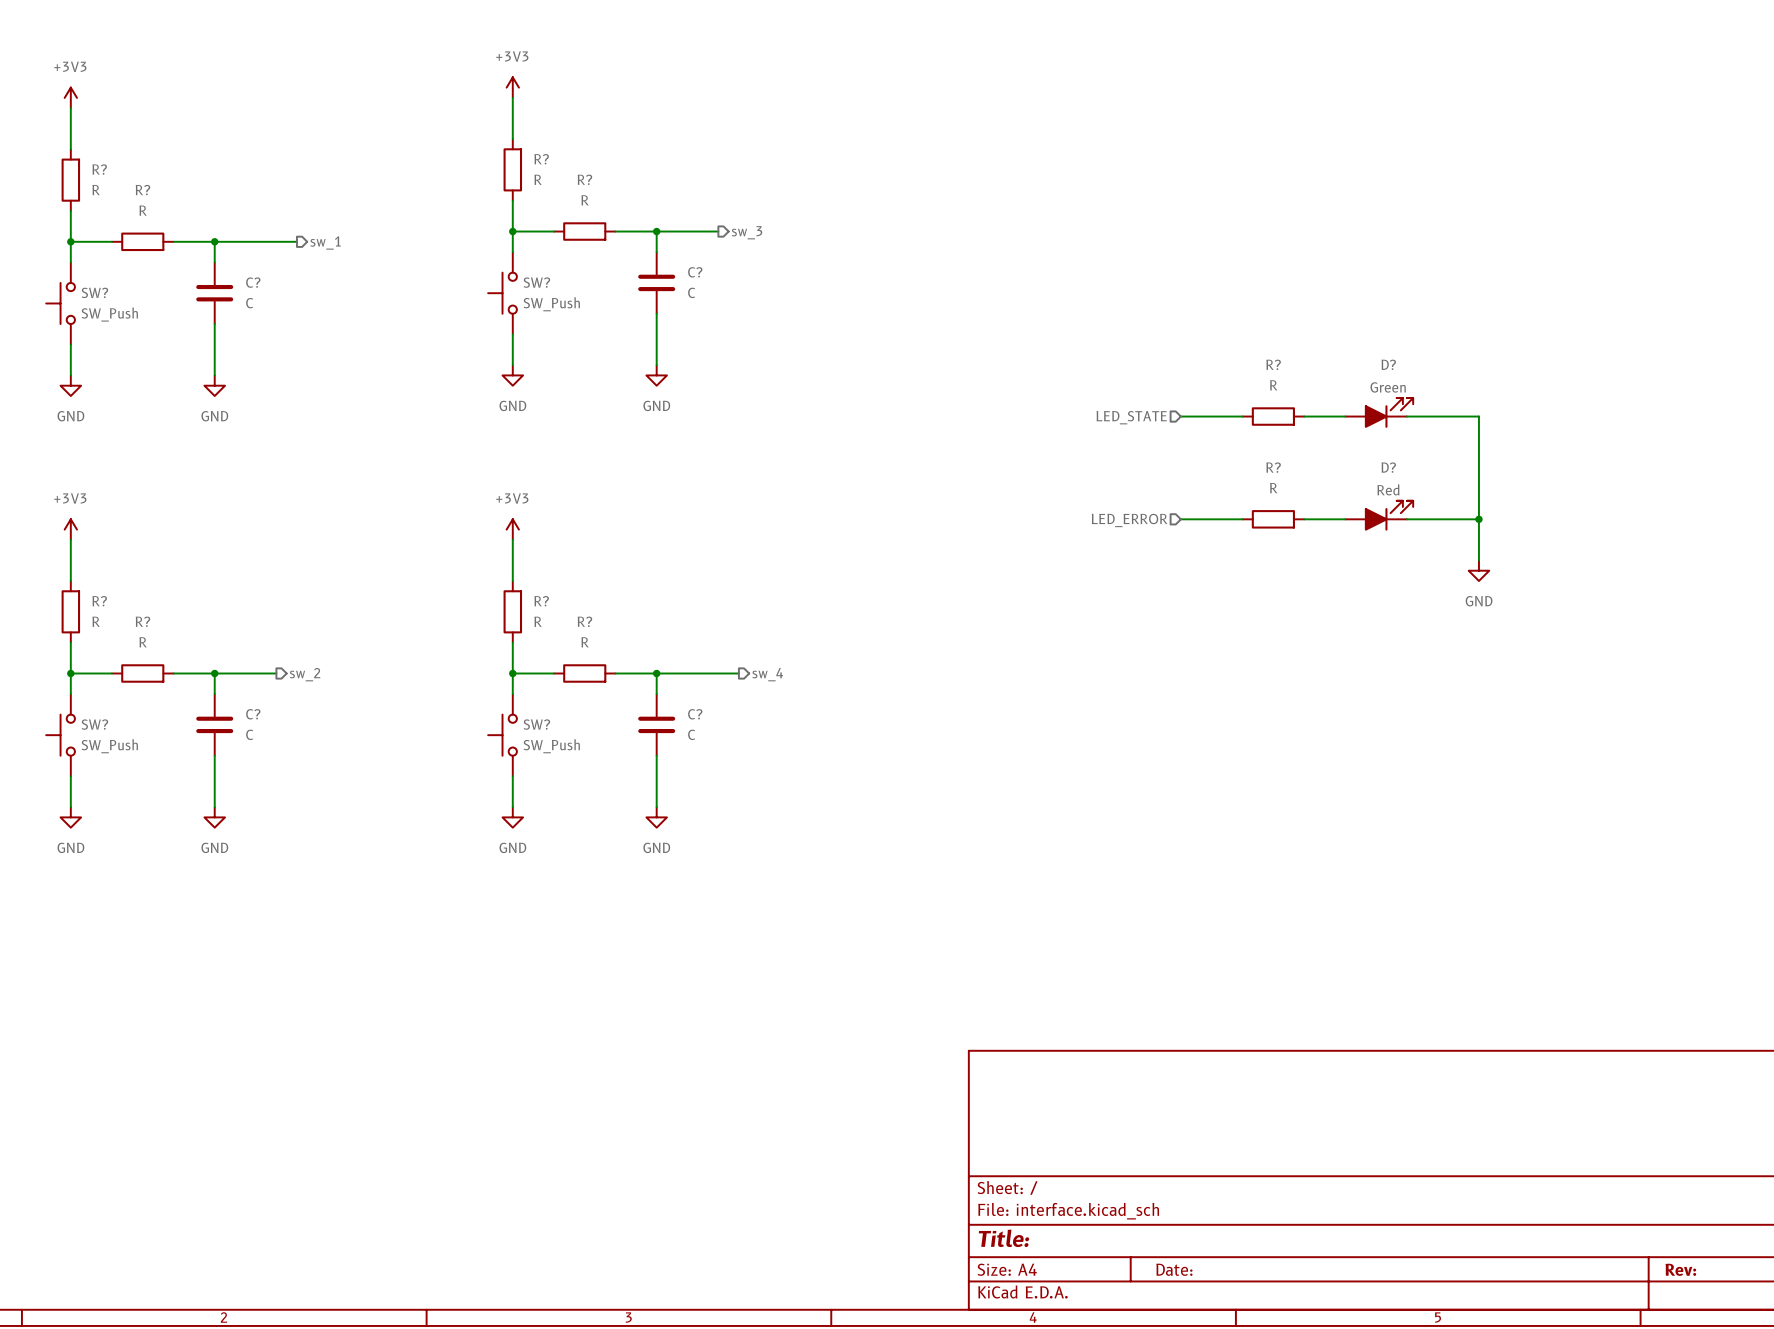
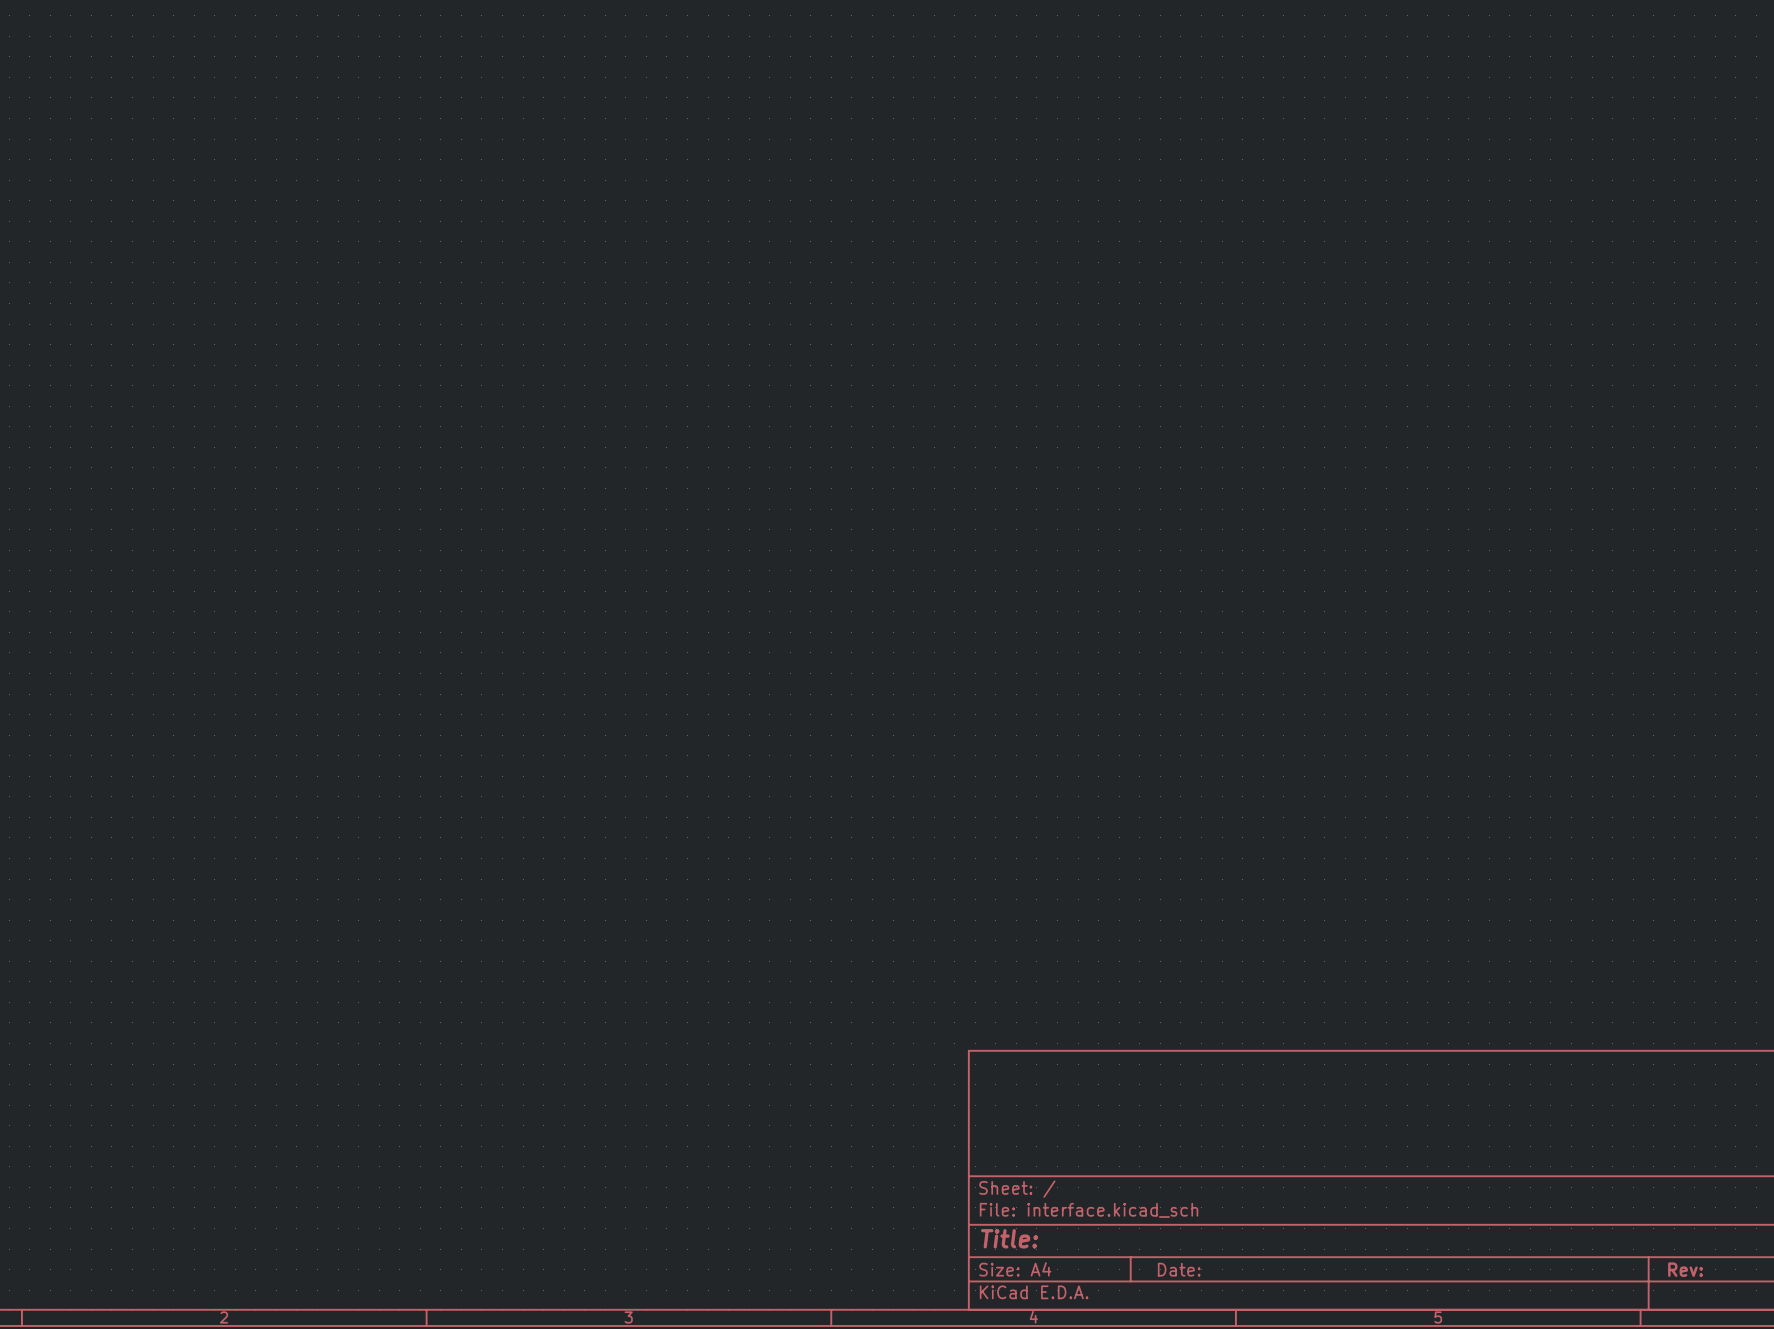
power symbol: +3V3 (512, 87) -> none
power symbol: +3V3 (70, 97) -> none
wire: (512, 97) (512, 139) -> none
wire: (70, 108) (70, 149) -> none
R?: R (512, 169) -> none
R?: R (70, 180) -> none
wire: (512, 200) (512, 252) -> none
wire: (70, 210) (70, 262) -> none
wire: (512, 231) (553, 231) -> none
junction: (512, 231) -> none
R?: R (584, 231) -> none
wire: (615, 231) (718, 231) -> none
wire: (656, 231) (656, 252) -> none
junction: (656, 231) -> none
hierarchical label: sw_3 (747, 232) -> none
wire: (70, 241) (111, 241) -> none
junction: (70, 241) -> none
R?: R (142, 241) -> none
wire: (173, 241) (296, 241) -> none
wire: (214, 241) (214, 262) -> none
junction: (214, 241) -> none
hierarchical label: sw_1 (325, 242) -> none
C?: C (656, 282) -> none
C?: C (214, 293) -> none
SW?: SW_Push (502, 293) -> none
SW?: SW_Push (60, 303) -> none
wire: (656, 313) (656, 365) -> none
wire: (214, 324) (214, 375) -> none
wire: (512, 334) (512, 365) -> none
wire: (70, 344) (70, 375) -> none
power symbol: GND (512, 375) -> none
power symbol: GND (656, 375) -> none
power symbol: GND (70, 385) -> none
power symbol: GND (214, 385) -> none
D?: Green (1379, 412) -> none
wire: (1180, 416) (1242, 416) -> none
R?: R (1273, 416) -> none
wire: (1304, 416) (1345, 416) -> none
wire: (1407, 416) (1478, 416) (1478, 560) -> none
hierarchical label: LED_STATE (1131, 417) -> none
D?: Red (1379, 515) -> none
wire: (1180, 519) (1242, 519) -> none
R?: R (1273, 519) -> none
wire: (1304, 519) (1345, 519) -> none
wire: (1407, 519) (1478, 519) -> none
junction: (1478, 519) -> none
hierarchical label: LED_ERROR (1129, 520) -> none
power symbol: +3V3 (70, 529) -> none
power symbol: +3V3 (512, 529) -> none
wire: (70, 539) (70, 580) -> none
wire: (512, 539) (512, 580) -> none
power symbol: GND (1478, 570) -> none
R?: R (70, 611) -> none
R?: R (512, 611) -> none
wire: (70, 642) (70, 694) -> none
wire: (512, 642) (512, 694) -> none
wire: (70, 673) (111, 673) -> none
junction: (70, 673) -> none
R?: R (142, 673) -> none
wire: (173, 673) (276, 673) -> none
wire: (214, 673) (214, 694) -> none
junction: (214, 673) -> none
wire: (512, 673) (553, 673) -> none
junction: (512, 673) -> none
R?: R (584, 673) -> none
wire: (615, 673) (738, 673) -> none
wire: (656, 673) (656, 694) -> none
junction: (656, 673) -> none
hierarchical label: sw_2 (305, 674) -> none
hierarchical label: sw_4 (767, 674) -> none
C?: C (214, 724) -> none
C?: C (656, 724) -> none
SW?: SW_Push (60, 735) -> none
SW?: SW_Push (502, 735) -> none
wire: (214, 755) (214, 807) -> none
wire: (656, 755) (656, 807) -> none
wire: (70, 776) (70, 807) -> none
wire: (512, 776) (512, 807) -> none
power symbol: GND (70, 817) -> none
power symbol: GND (214, 817) -> none
power symbol: GND (512, 817) -> none
power symbol: GND (656, 817) -> none

